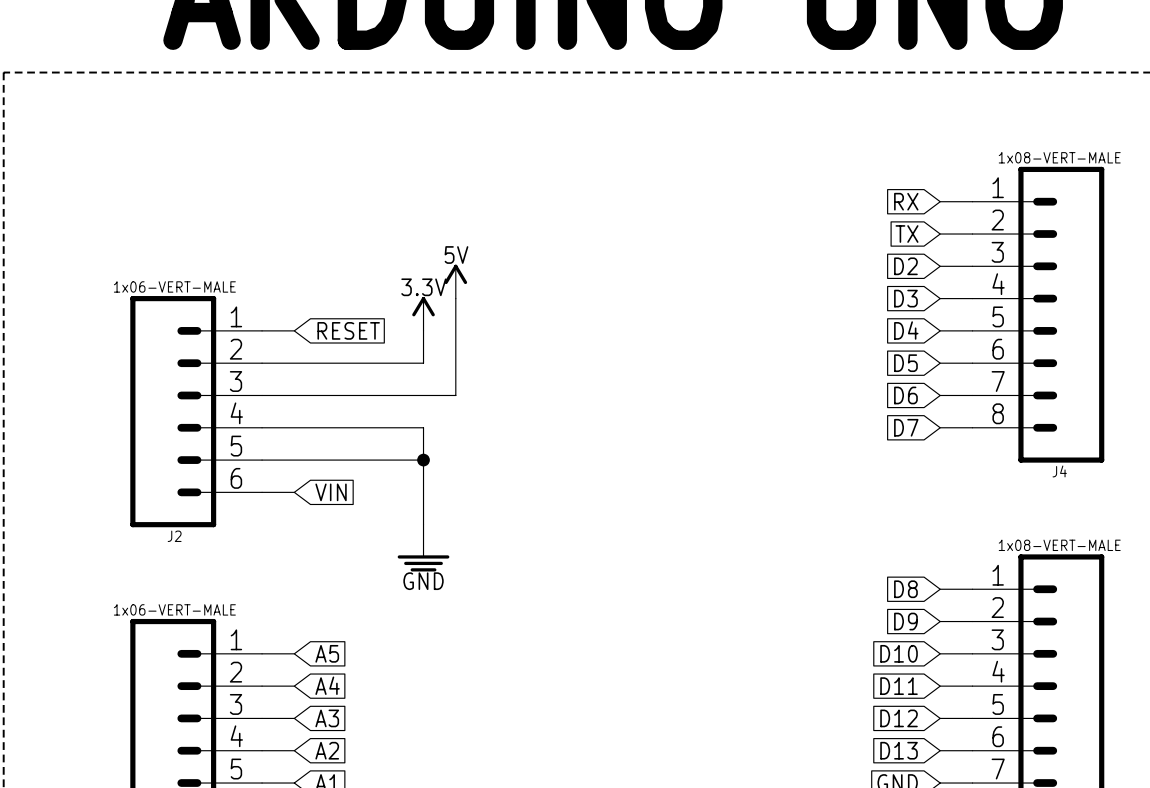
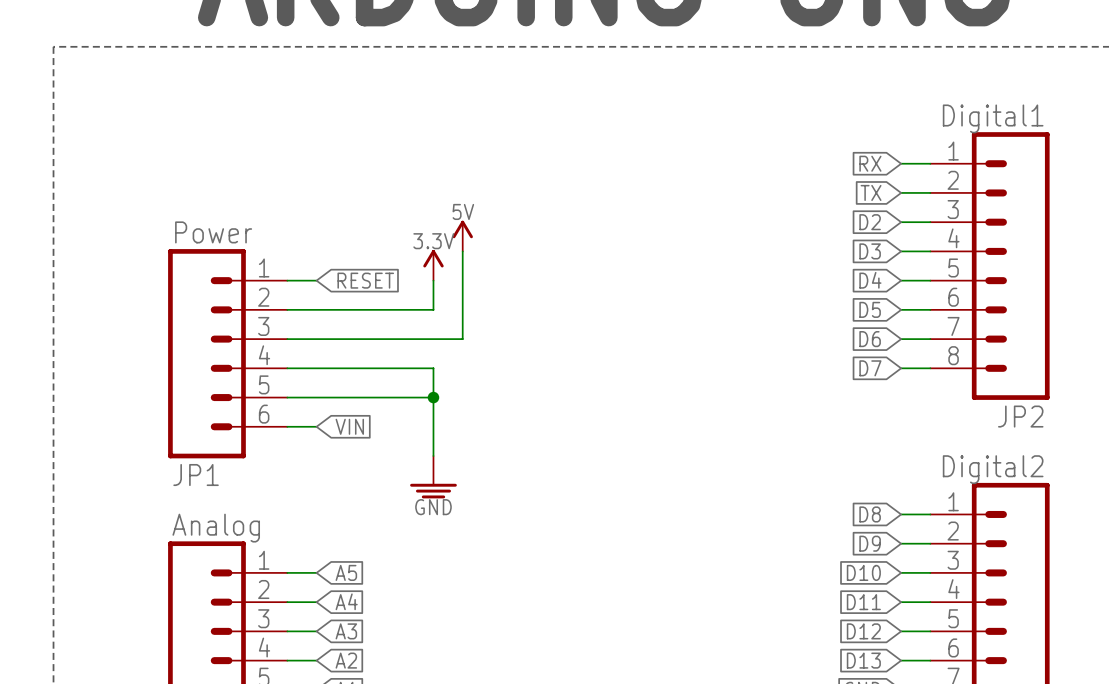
J4 value: 1x08-VERT-MALE (1059, 157) -> Digital1 (993, 118)
J2 value: 1x06-VERT-MALE (174, 286) -> Power (213, 232)
J4 name: J4 (1059, 471) -> JP2 (1020, 416)
J2 name: J2 (174, 536) -> JP1 (196, 475)
part value: 1x08-VERT-MALE (1059, 545) -> Digital2 (993, 469)
part value: 1x06-VERT-MALE (174, 609) -> Analog (216, 528)

